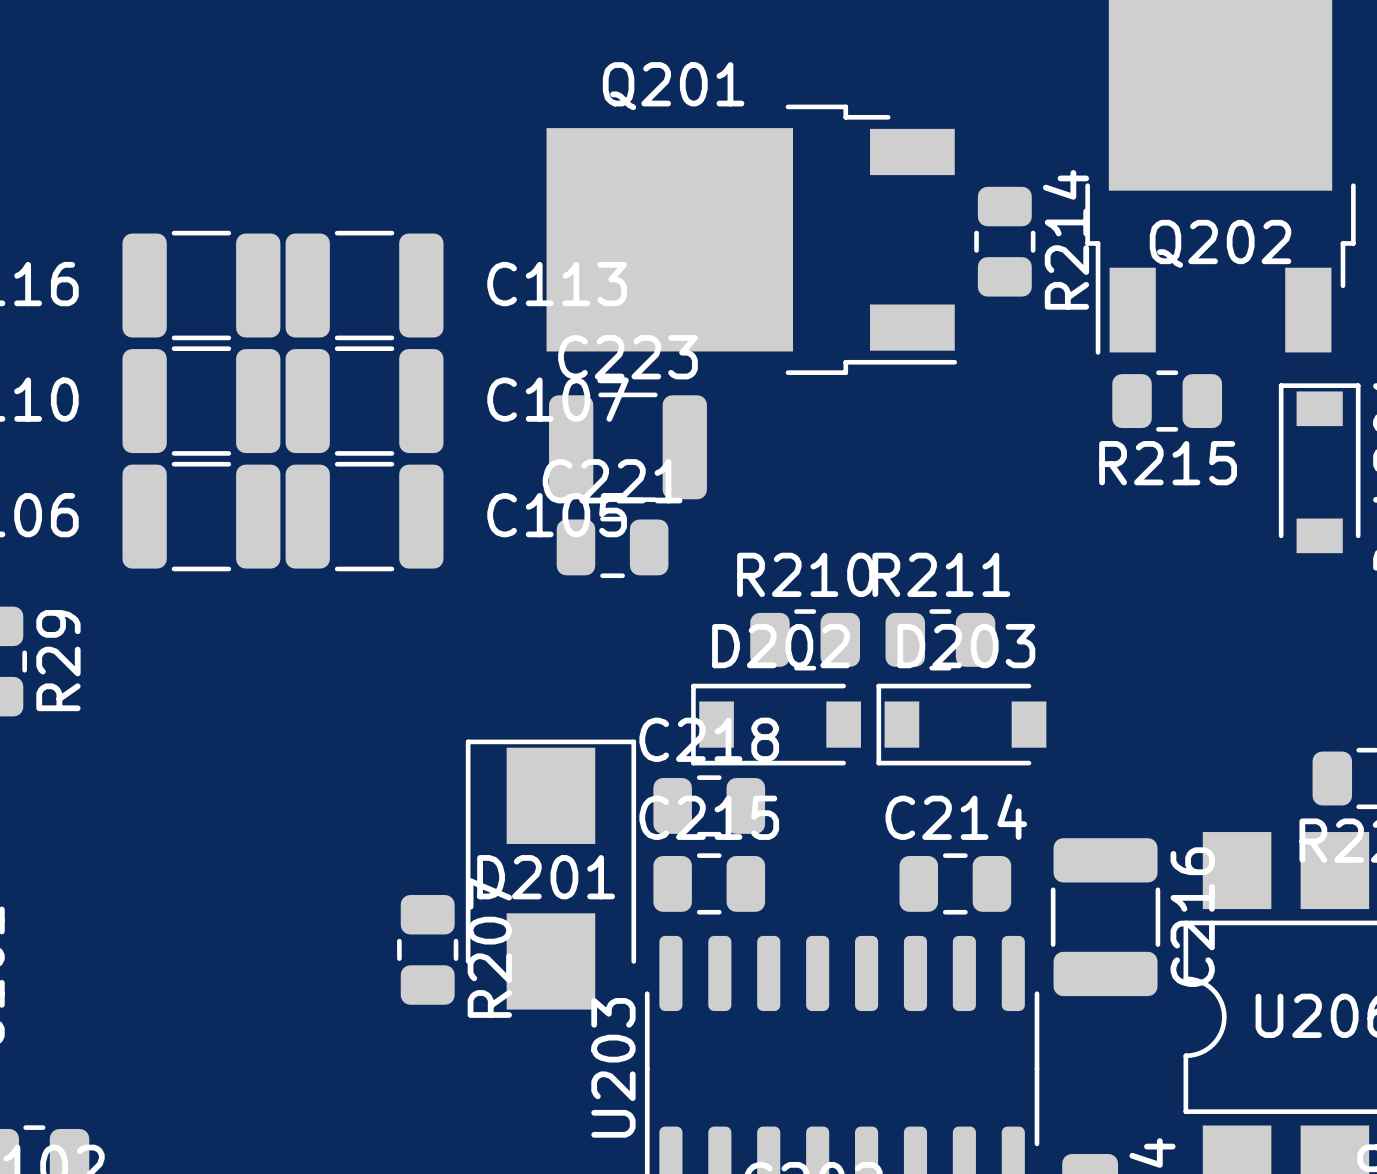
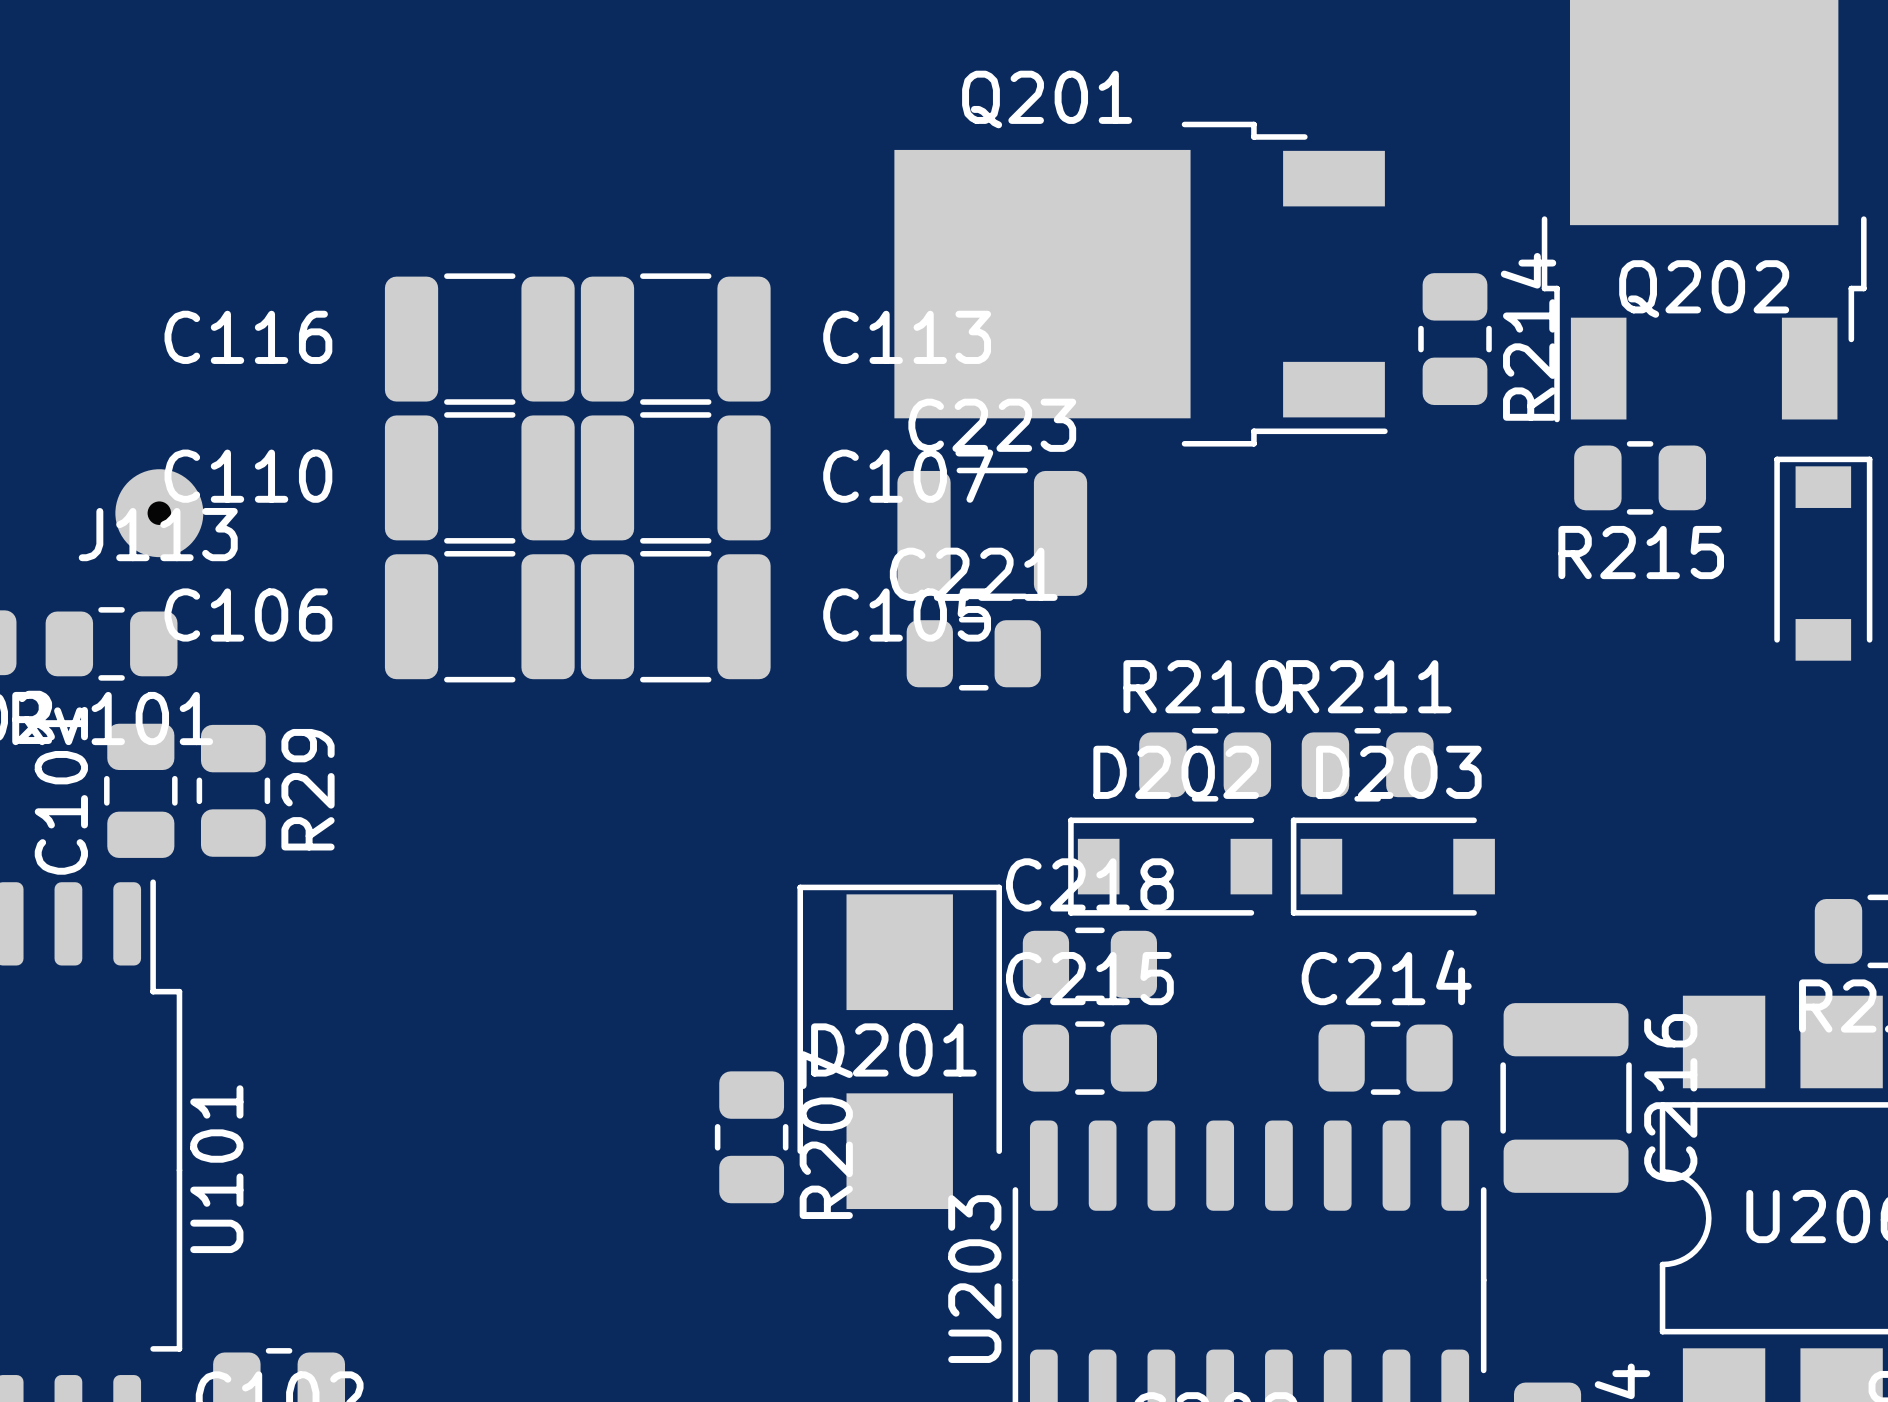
R214 position: (1004, 241) -> (1455, 339)

